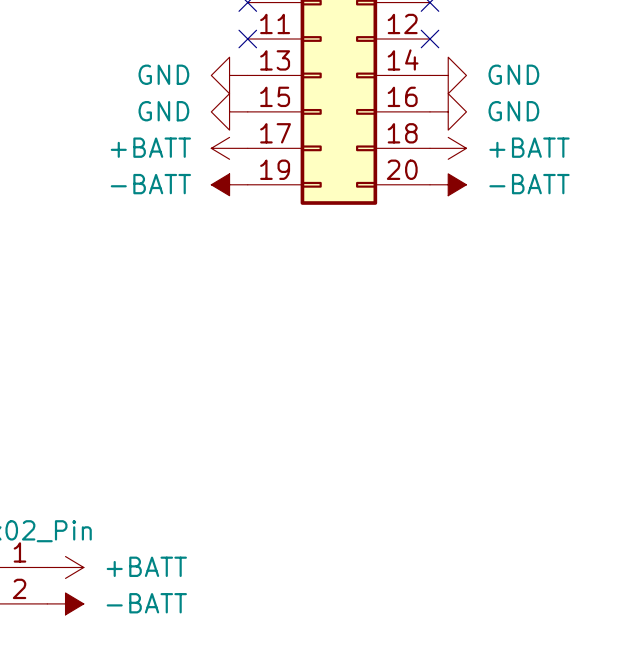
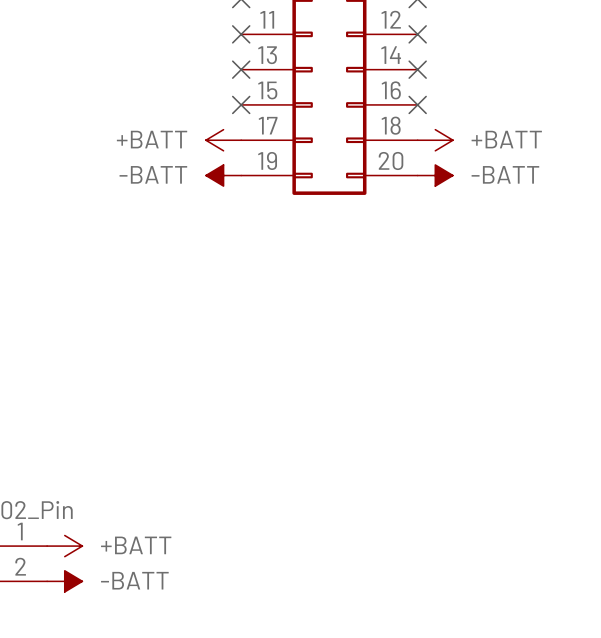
power symbol: GND (229, 75) -> none
no-connect mark: none -> (241, 69)
no-connect mark: none -> (417, 69)
power symbol: GND (448, 75) -> none
power symbol: GND (229, 111) -> none
no-connect mark: none -> (241, 104)
no-connect mark: none -> (417, 104)
power symbol: GND (448, 111) -> none

